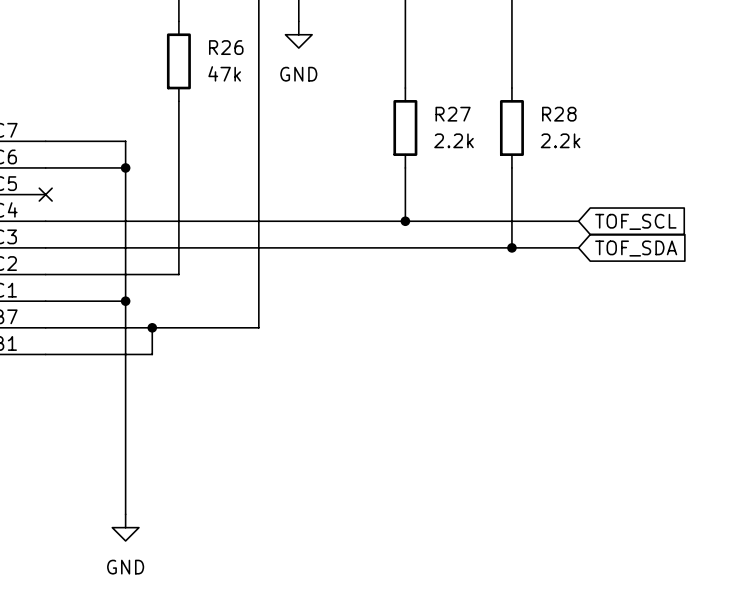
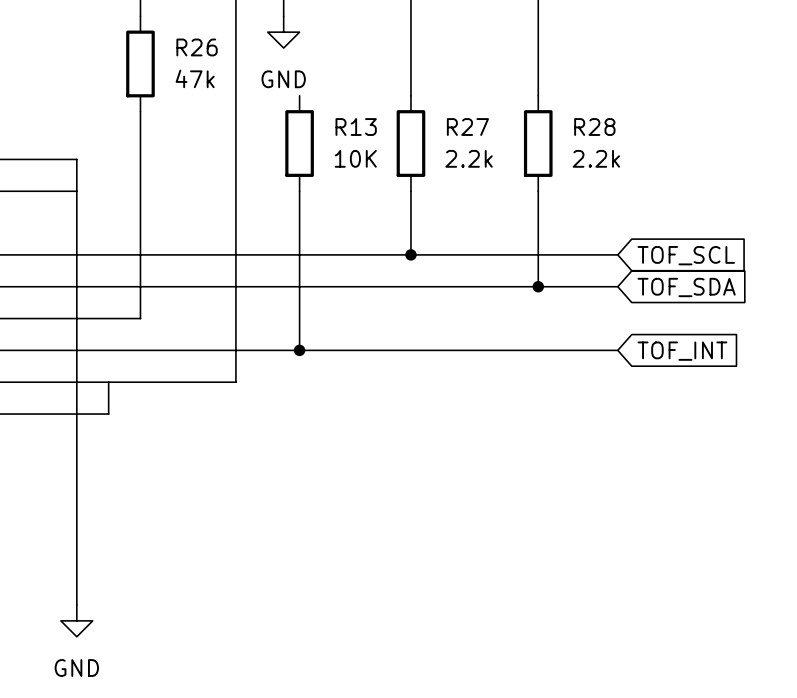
R13: none -> 10K (299, 143)
junction: (125, 167) -> none
wire: none -> (299, 191) (299, 350)
wire: none -> (76, 350) (617, 350)
junction: (125, 301) -> none
junction: none -> (299, 350)
global label: none -> TOF_INT (682, 351)
junction: (152, 327) -> none

